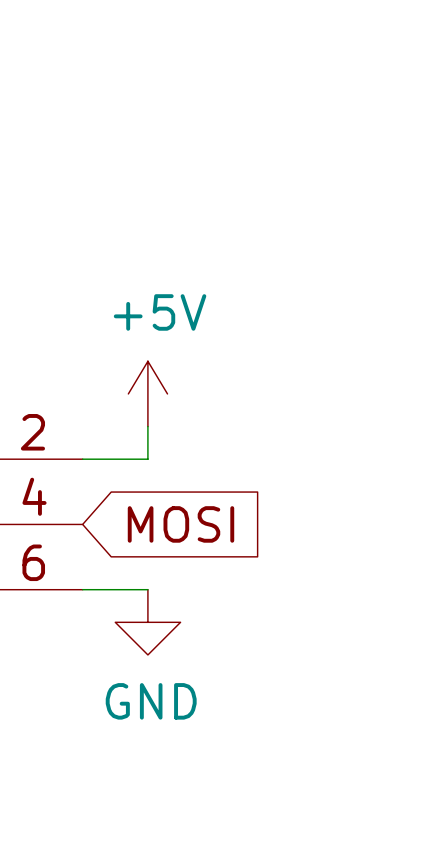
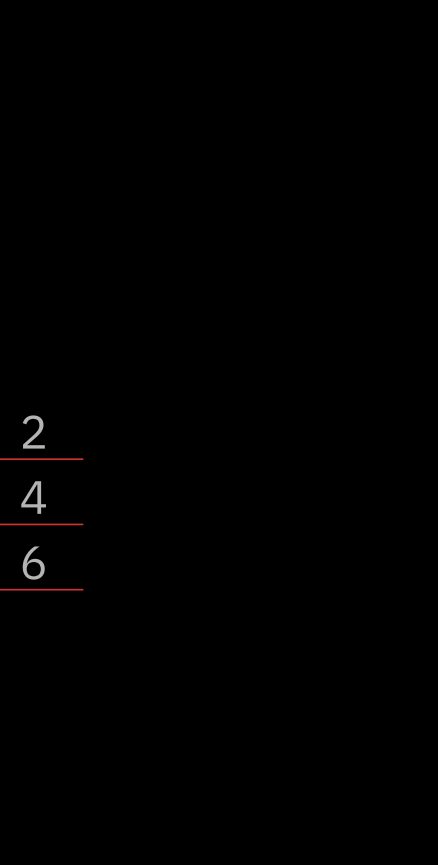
power symbol: +5V (147, 393) -> none
wire: (147, 426) (147, 459) (82, 459) -> none
global label: MOSI (180, 524) -> none
wire: (82, 589) (147, 589) -> none
power symbol: GND (147, 622) -> none

